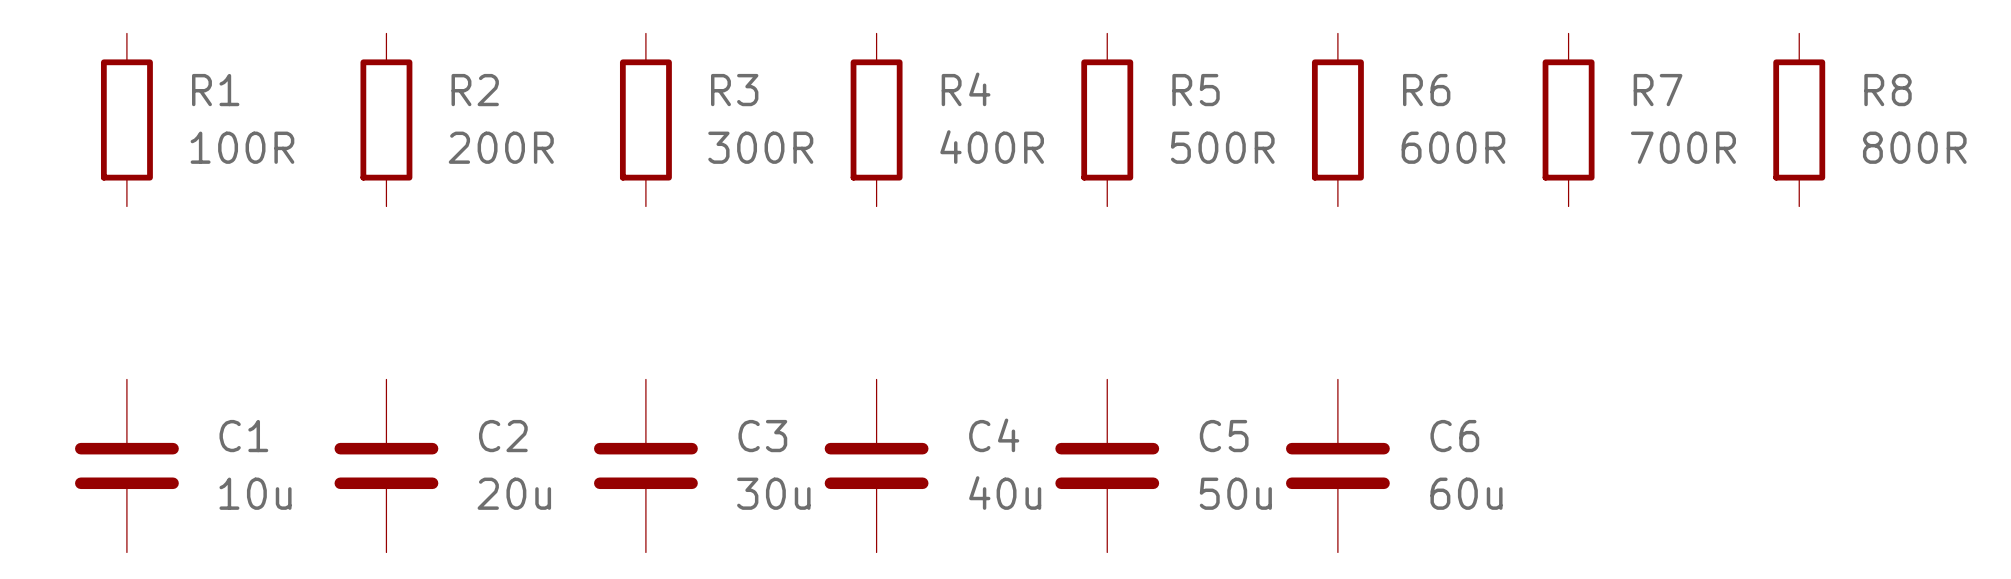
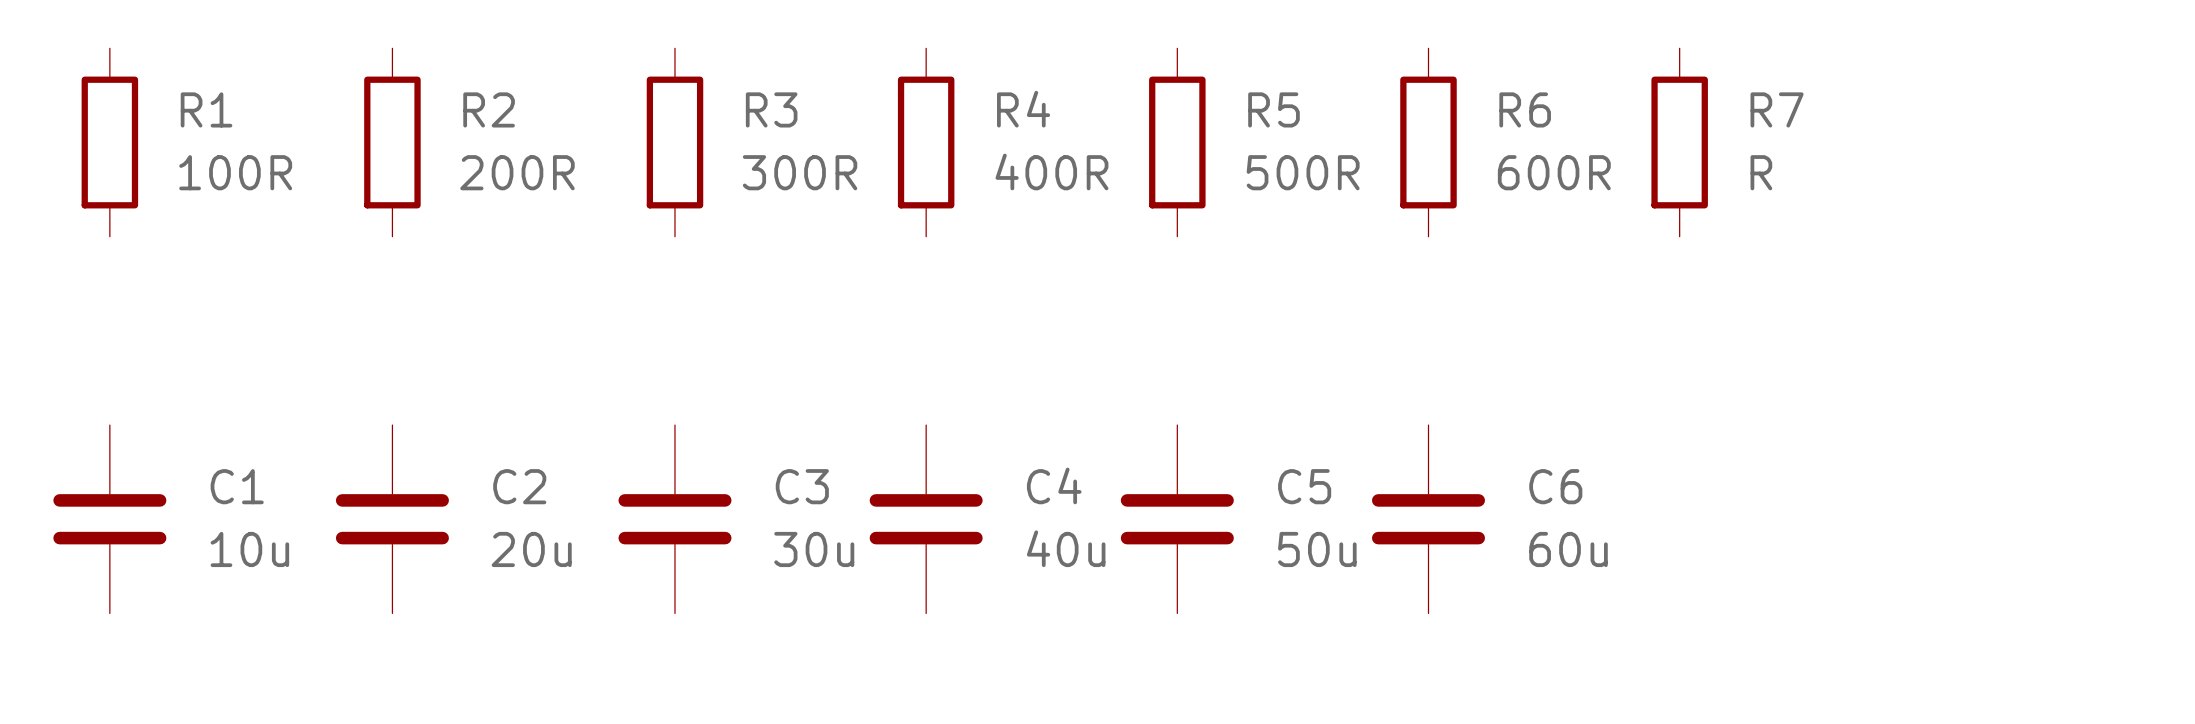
R8: 800R (1799, 119) -> none
R7 value: 700R (1683, 147) -> R (1761, 172)

